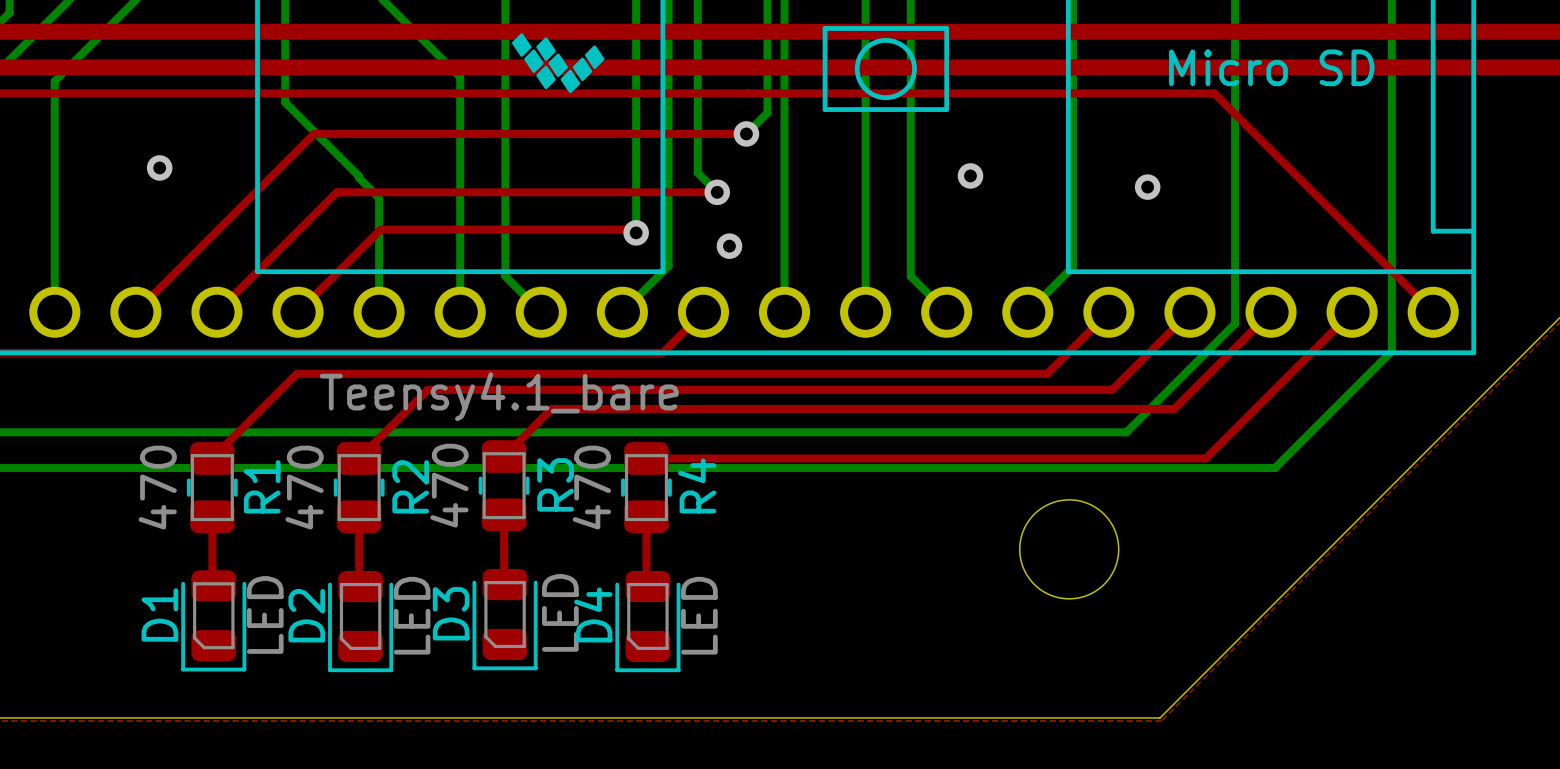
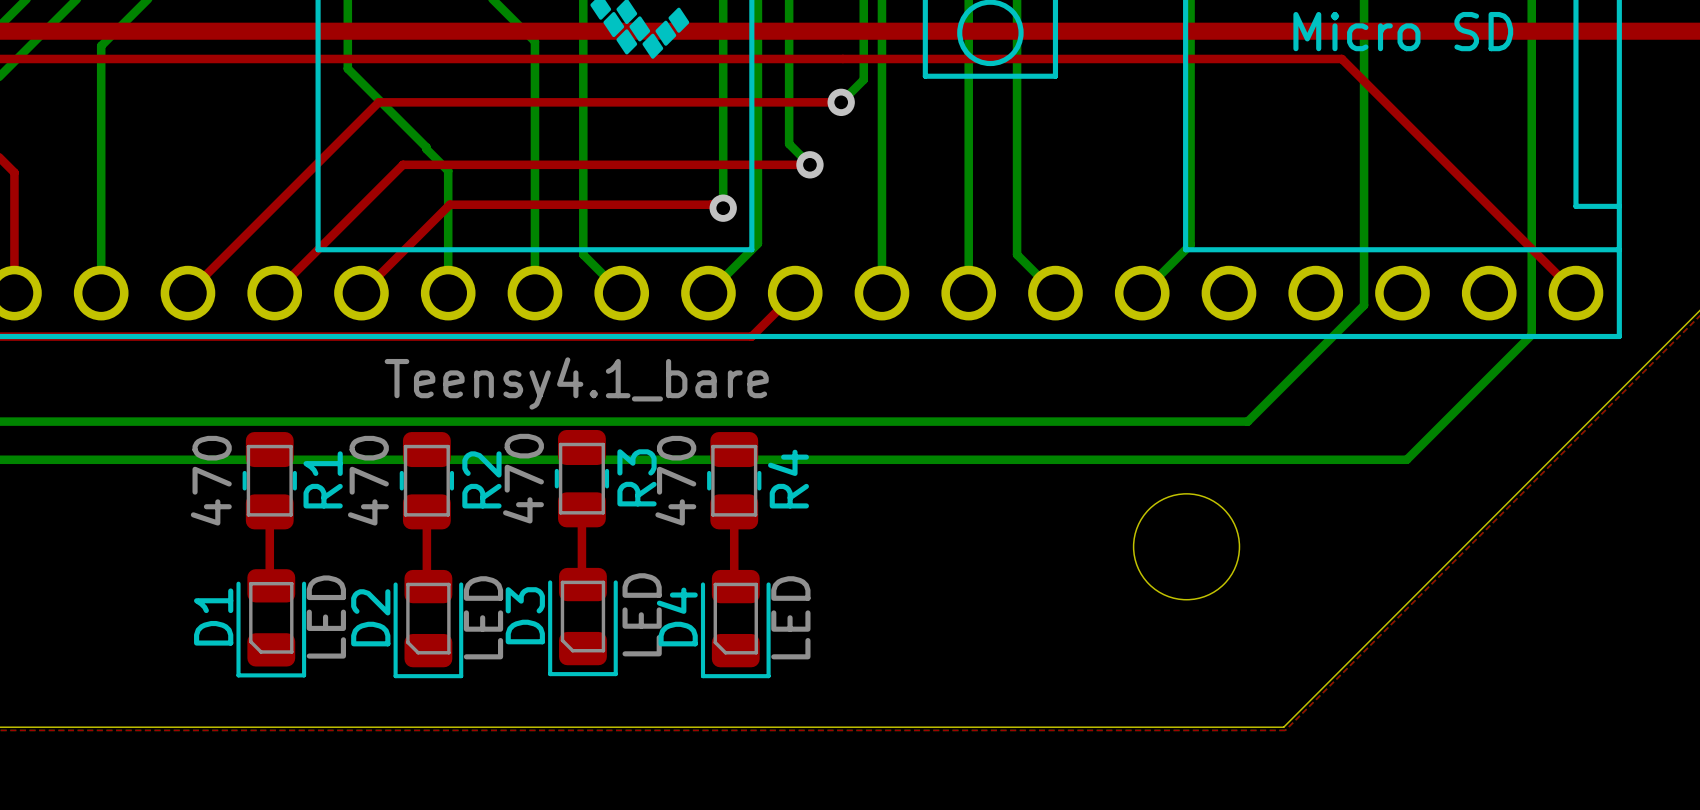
via: (159, 167) -> none
via: (970, 175) -> none
via: (1147, 187) -> none
via: (729, 246) -> none
top track: (1108, 312) (1047, 373) (296, 373) (212, 458) -> none
top track: (1189, 312) (1112, 389) (427, 389) (361, 456) -> none
top track: (1271, 312) (1174, 408) (551, 408) (504, 456) -> none
top track: (1352, 312) (1205, 458) (646, 458) -> none

